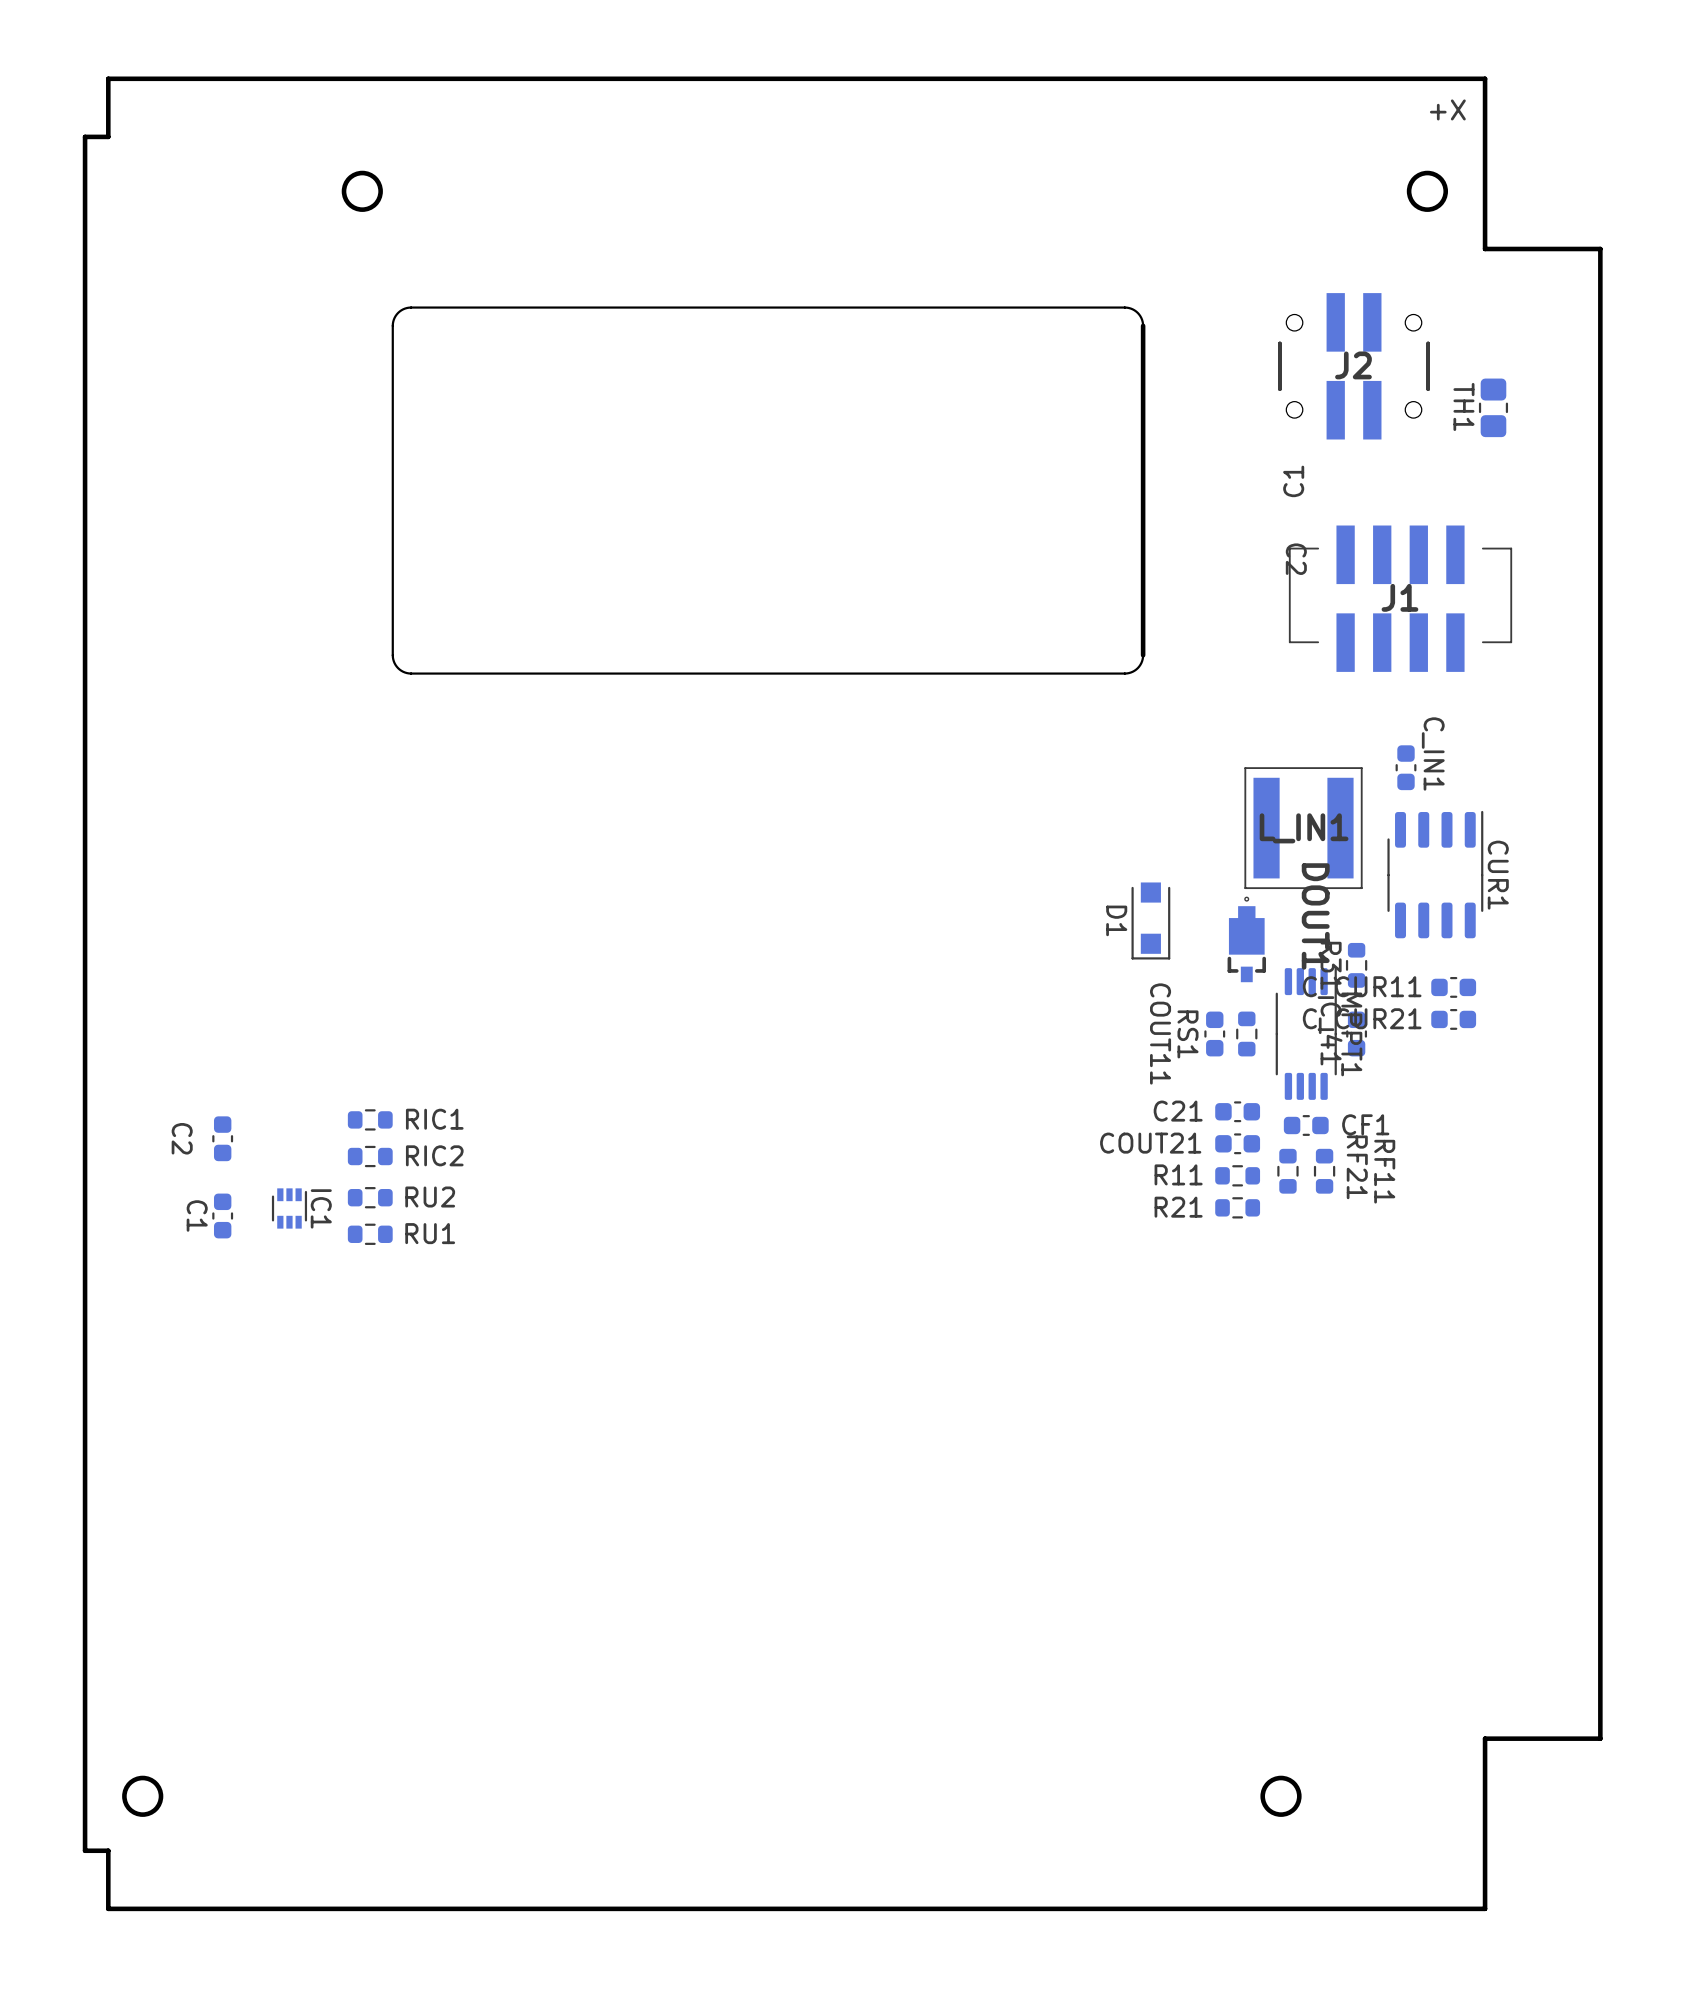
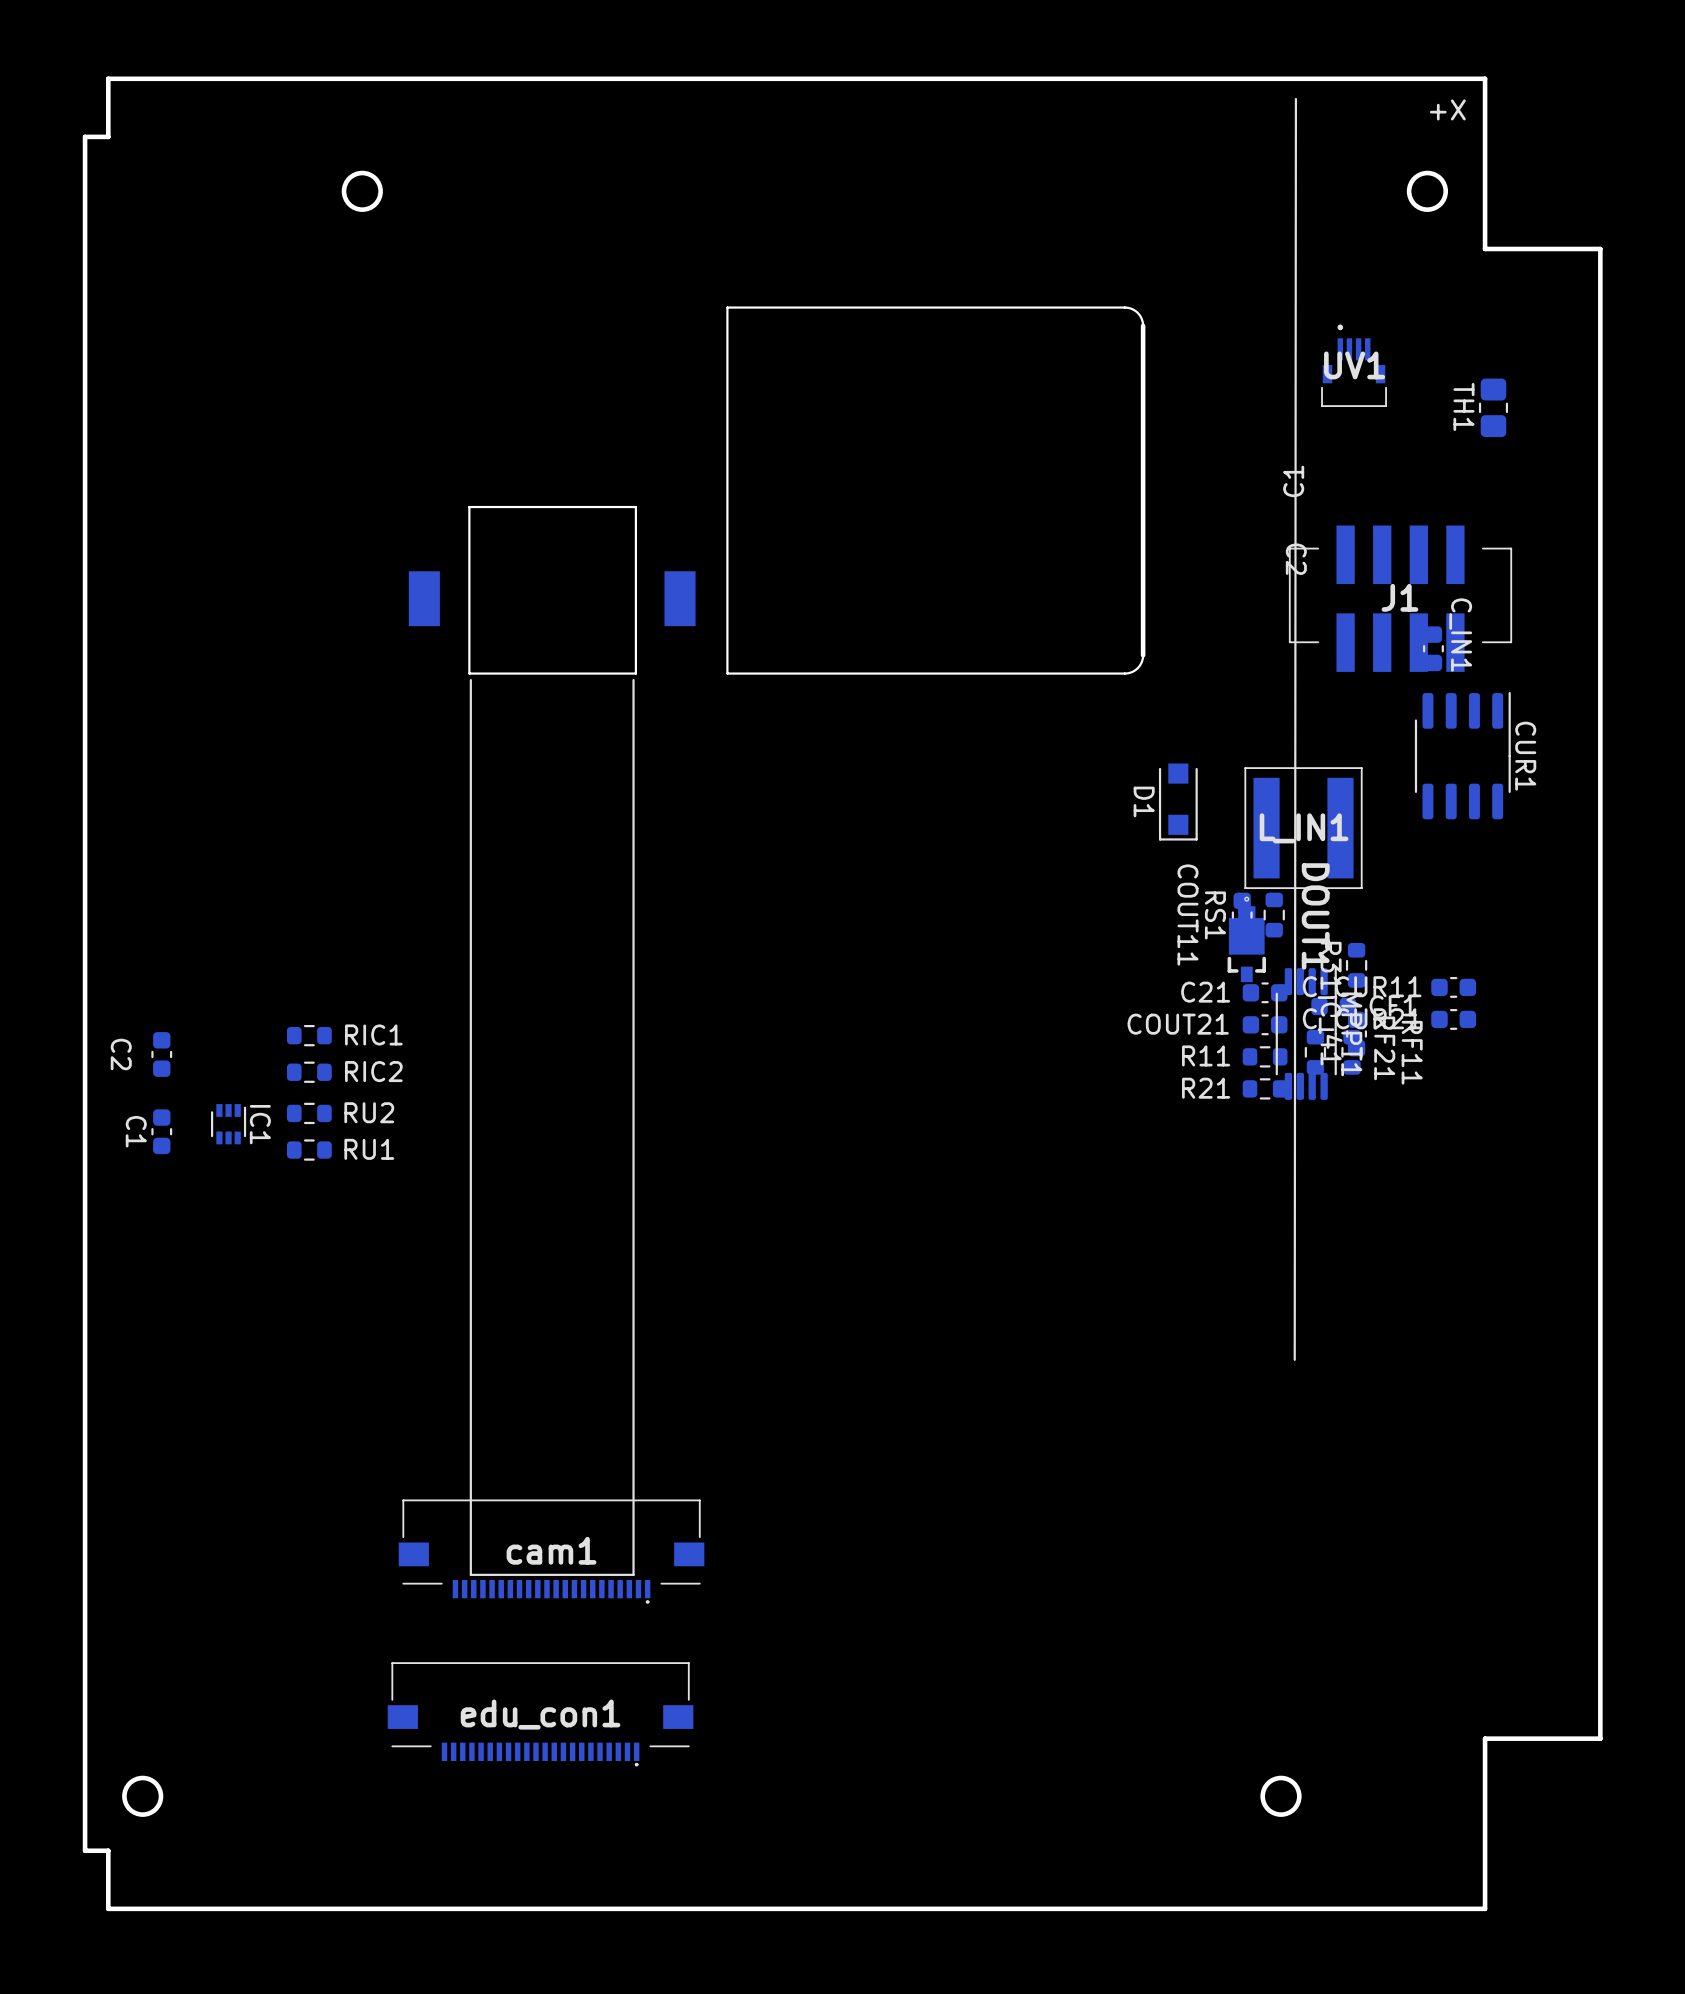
drawing shape: [82, 76, 1603, 1912] -> [82, 76, 1603, 1912]
UV1: none -> (1354, 365)
J2: (1354, 366) -> none
part: none -> (424, 598)
part: none -> (680, 598)
C_IN1 position: (1406, 767) -> (1433, 648)
CUR1 position: (1435, 874) -> (1462, 755)
D1 position: (1150, 920) -> (1178, 802)
COUT11 position: (1214, 1033) -> (1242, 915)
RS1 position: (1246, 1033) -> (1274, 915)
C21 position: (1237, 1111) -> (1265, 992)
RIC1 position: (370, 1119) -> (309, 1035)
CF1 position: (1306, 1125) -> (1333, 1006)
C2 position: (222, 1138) -> (161, 1054)
COUT21 position: (1237, 1143) -> (1265, 1024)
RIC2 position: (370, 1156) -> (309, 1072)
RF21 position: (1287, 1171) -> (1315, 1052)
RF11 position: (1324, 1171) -> (1352, 1052)
R11 position: (1237, 1175) -> (1265, 1056)
RU2 position: (370, 1197) -> (309, 1113)
R21 position: (1237, 1207) -> (1265, 1088)
IC1 position: (289, 1208) -> (228, 1124)
C1 position: (222, 1215) -> (161, 1131)
RU1 position: (370, 1234) -> (309, 1150)
cam1: none -> (551, 1551)
edu_con1: none -> (540, 1714)

